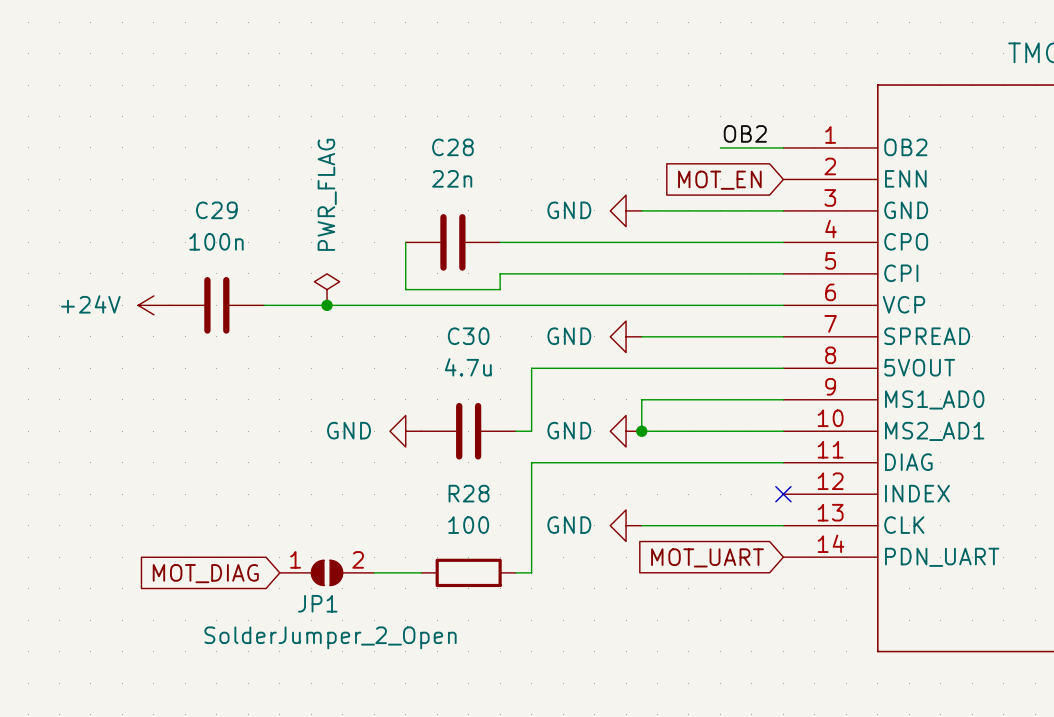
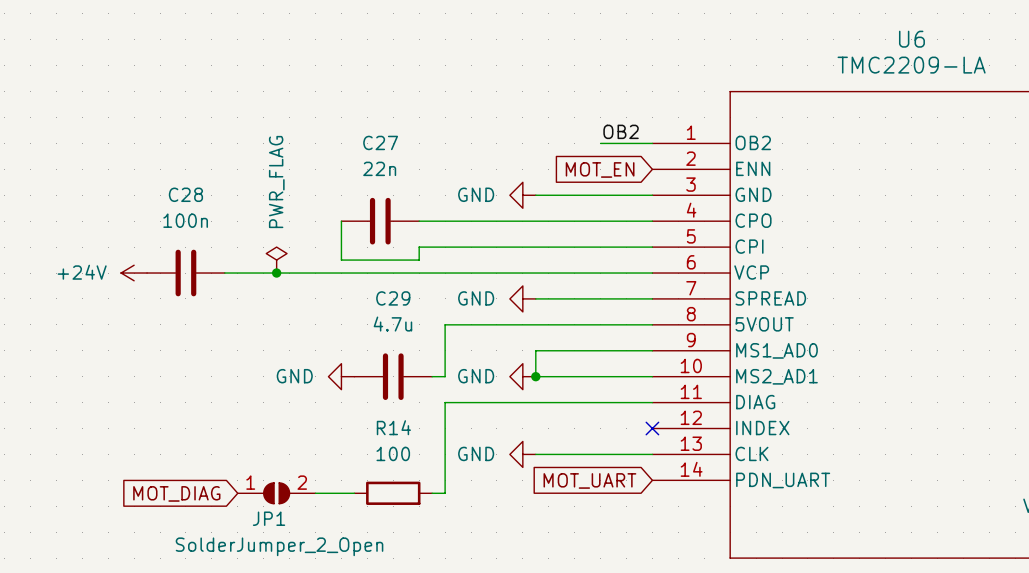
C28 name: C28 (452, 147) -> C27 (380, 142)
C29 name: C29 (216, 210) -> C28 (185, 194)
C30 name: C30 (468, 336) -> C29 (393, 298)
R28 name: R28 (469, 493) -> R14 (393, 427)

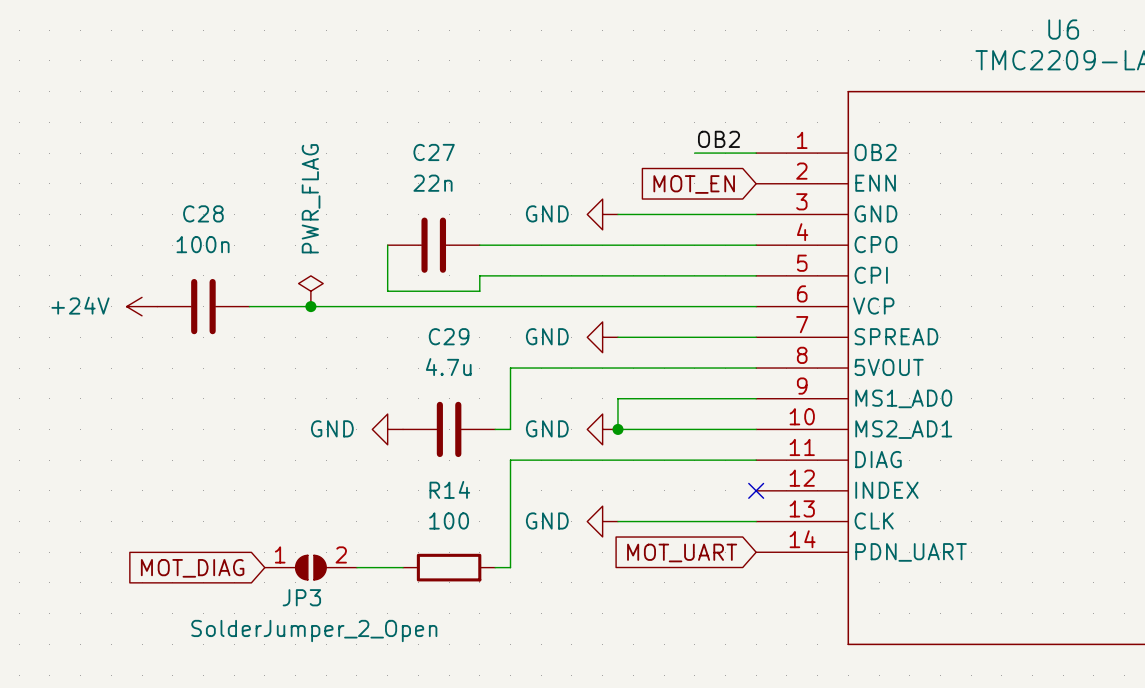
JP1 name: JP1 (269, 518) -> JP3 (301, 597)

